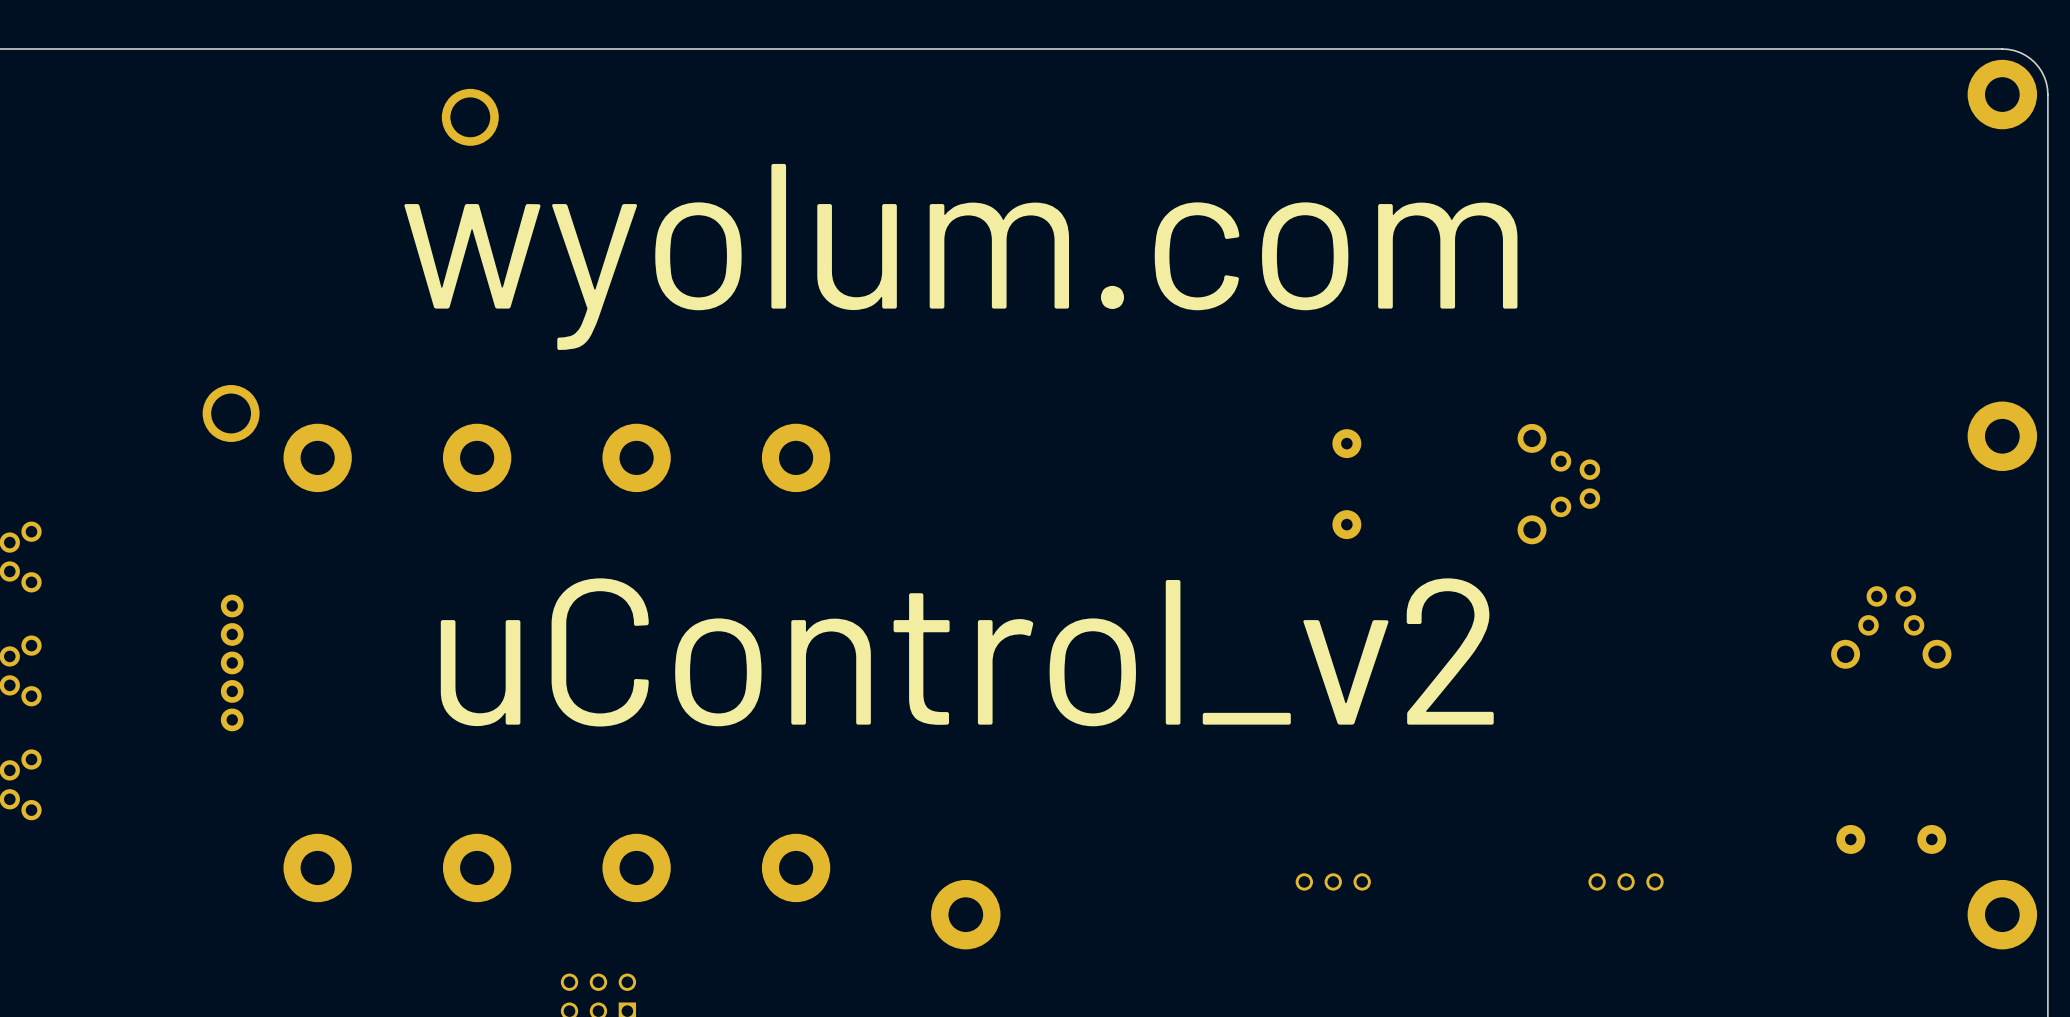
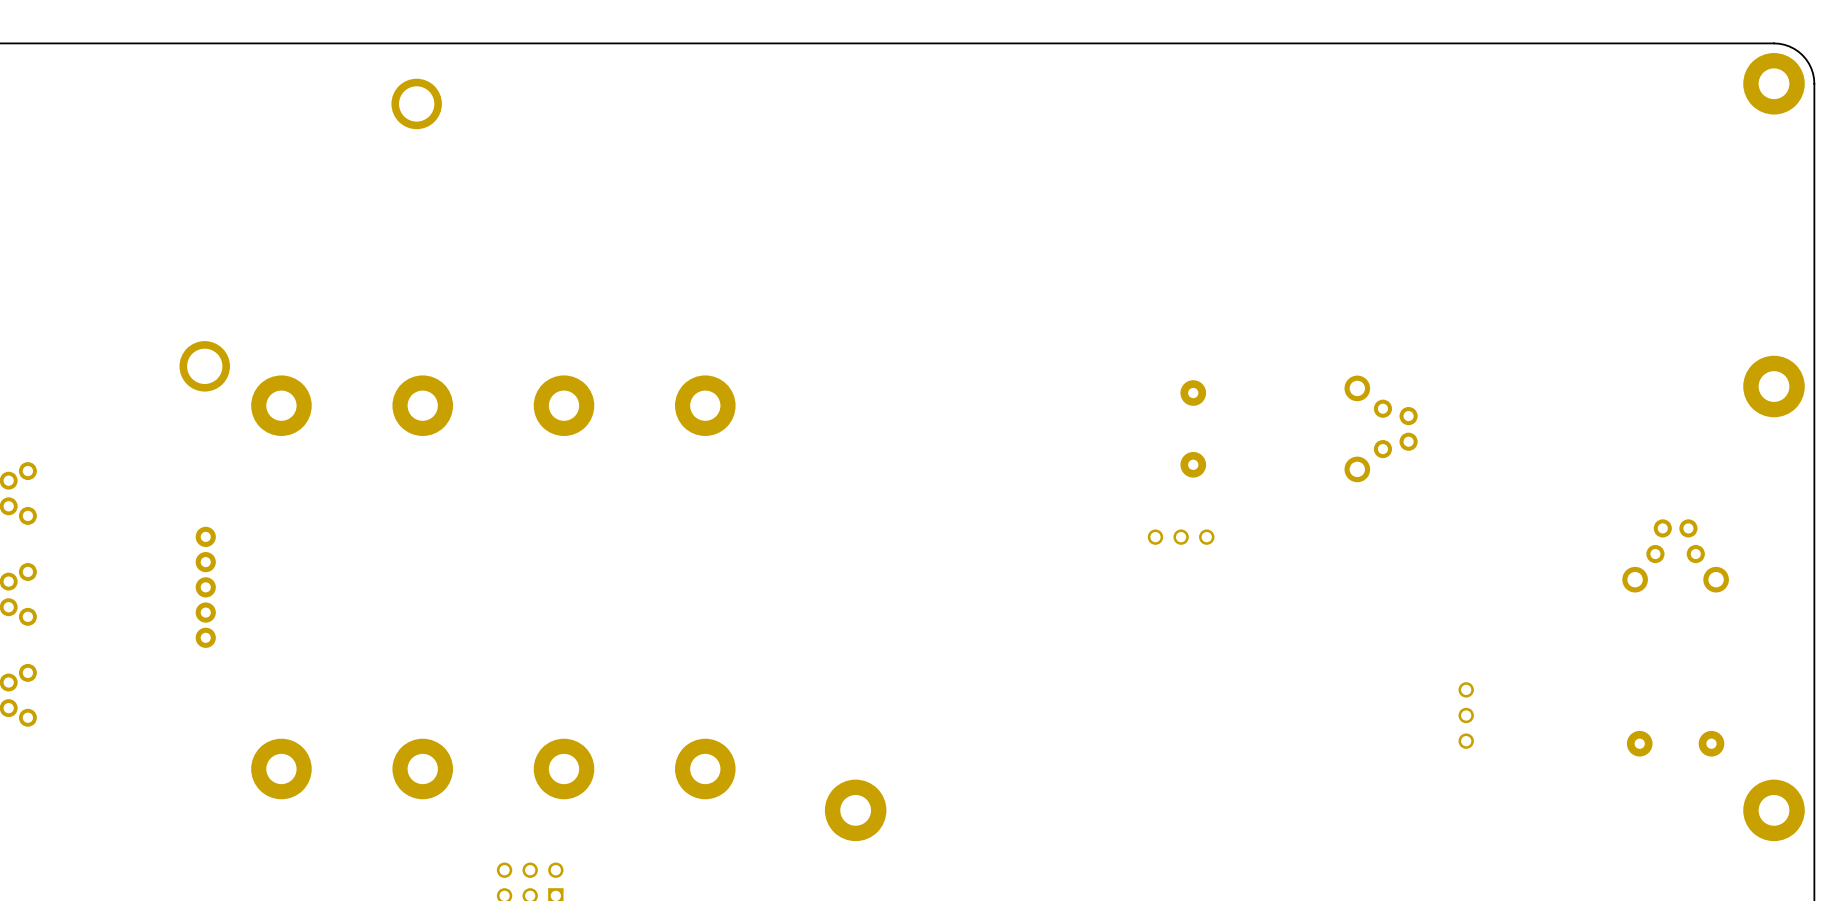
text: wyolum.com (960, 256) -> none
part: none -> (1181, 537)
text: uControl_v2 (967, 652) -> none
part: (1333, 881) -> none
part rotation: 0° (1626, 881) -> 90° clockwise (1466, 715)
part position: (1626, 881) -> (1466, 715)

